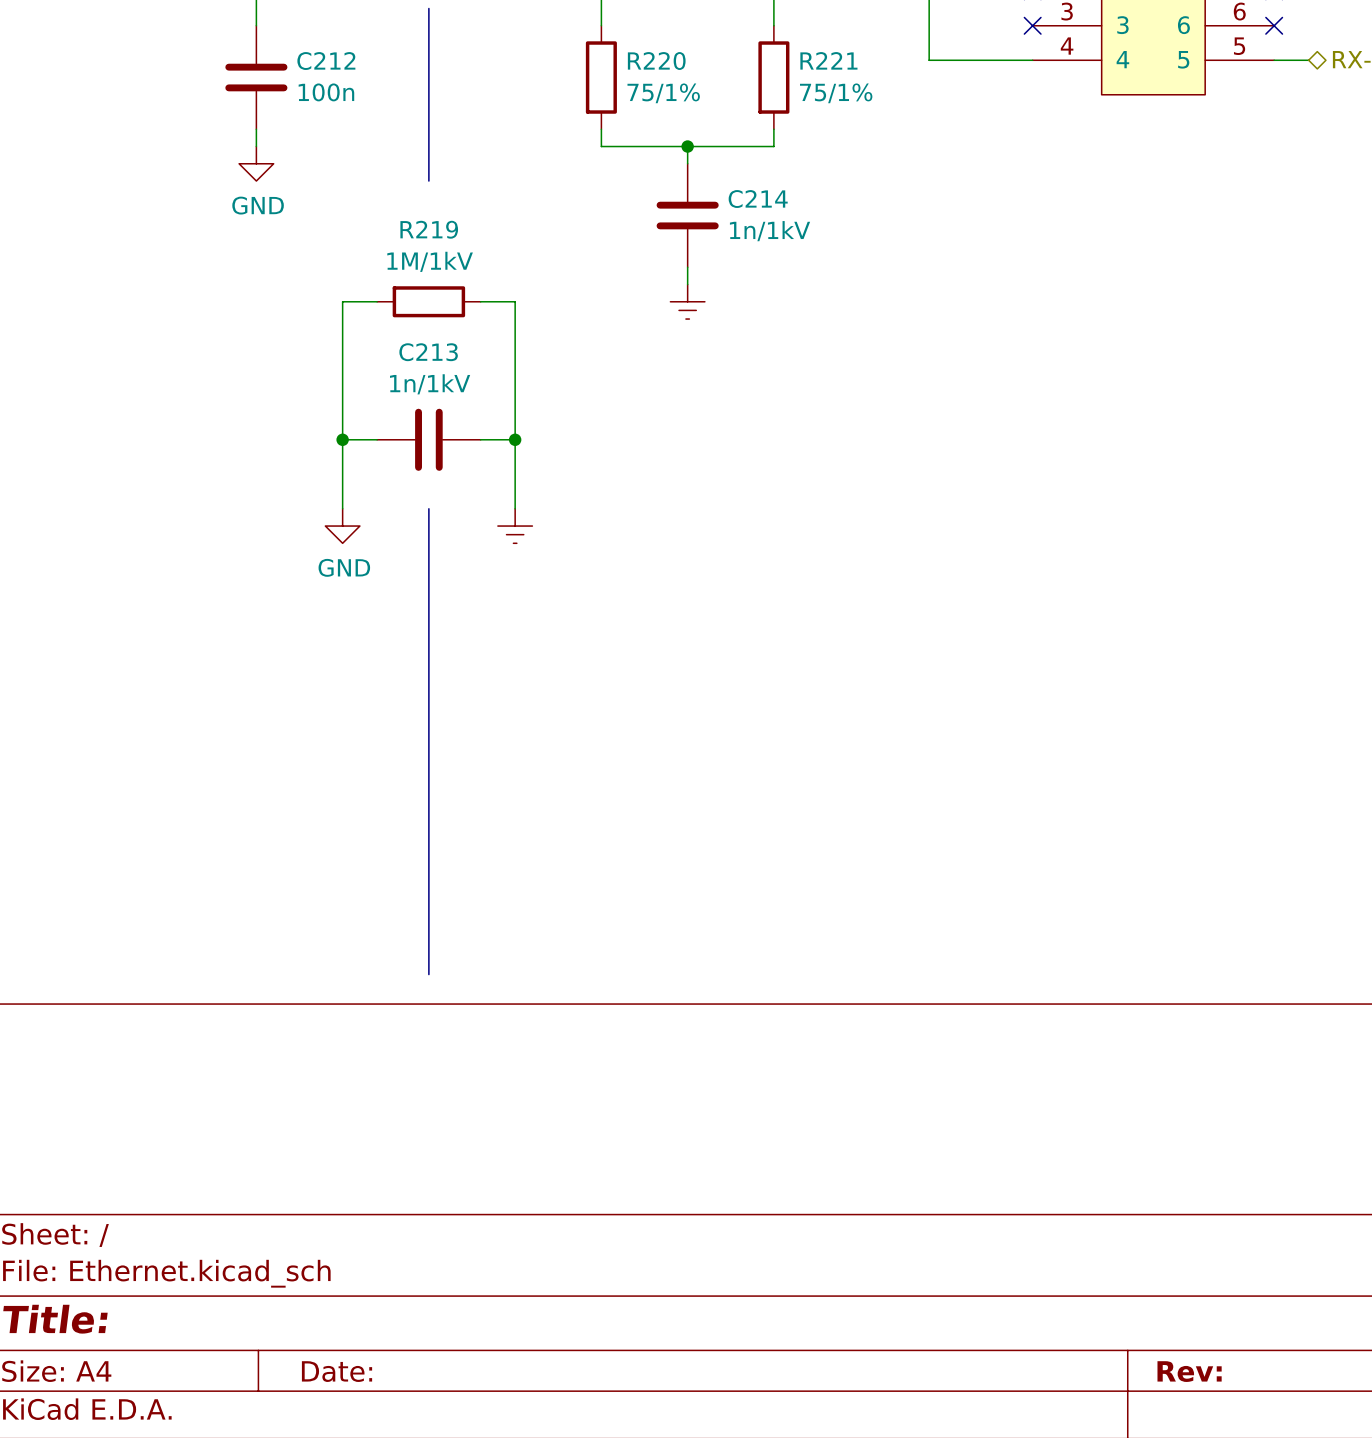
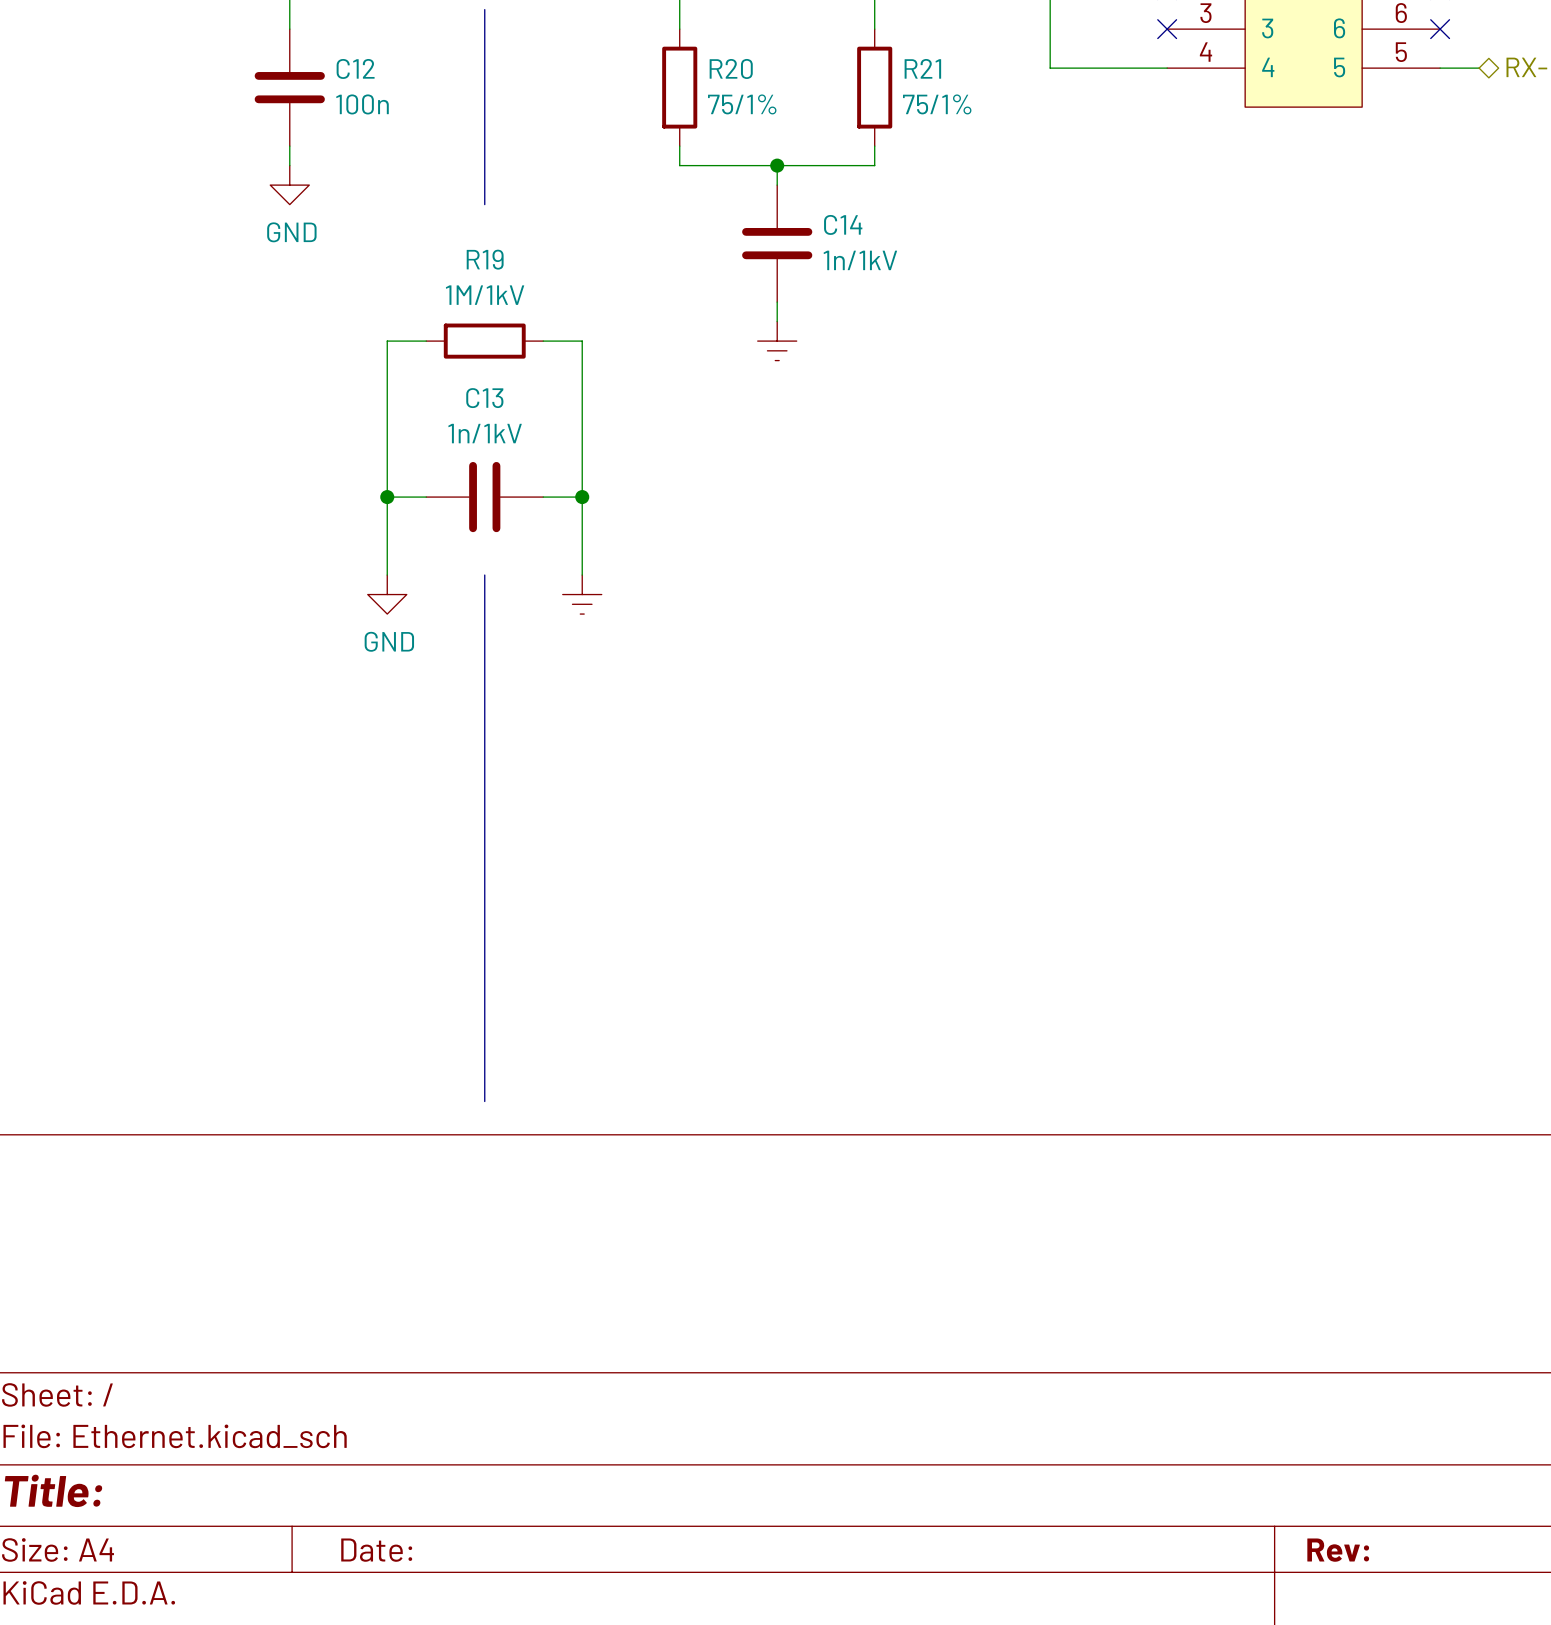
R221 name: R221 (828, 60) -> R21 (922, 68)
C212 name: C212 (326, 61) -> C12 (355, 68)
R220 name: R220 (656, 61) -> R20 (731, 68)
C214 name: C214 (758, 199) -> C14 (843, 224)
R219 name: R219 (429, 229) -> R19 (485, 259)
C213 name: C213 (428, 352) -> C13 (484, 398)

